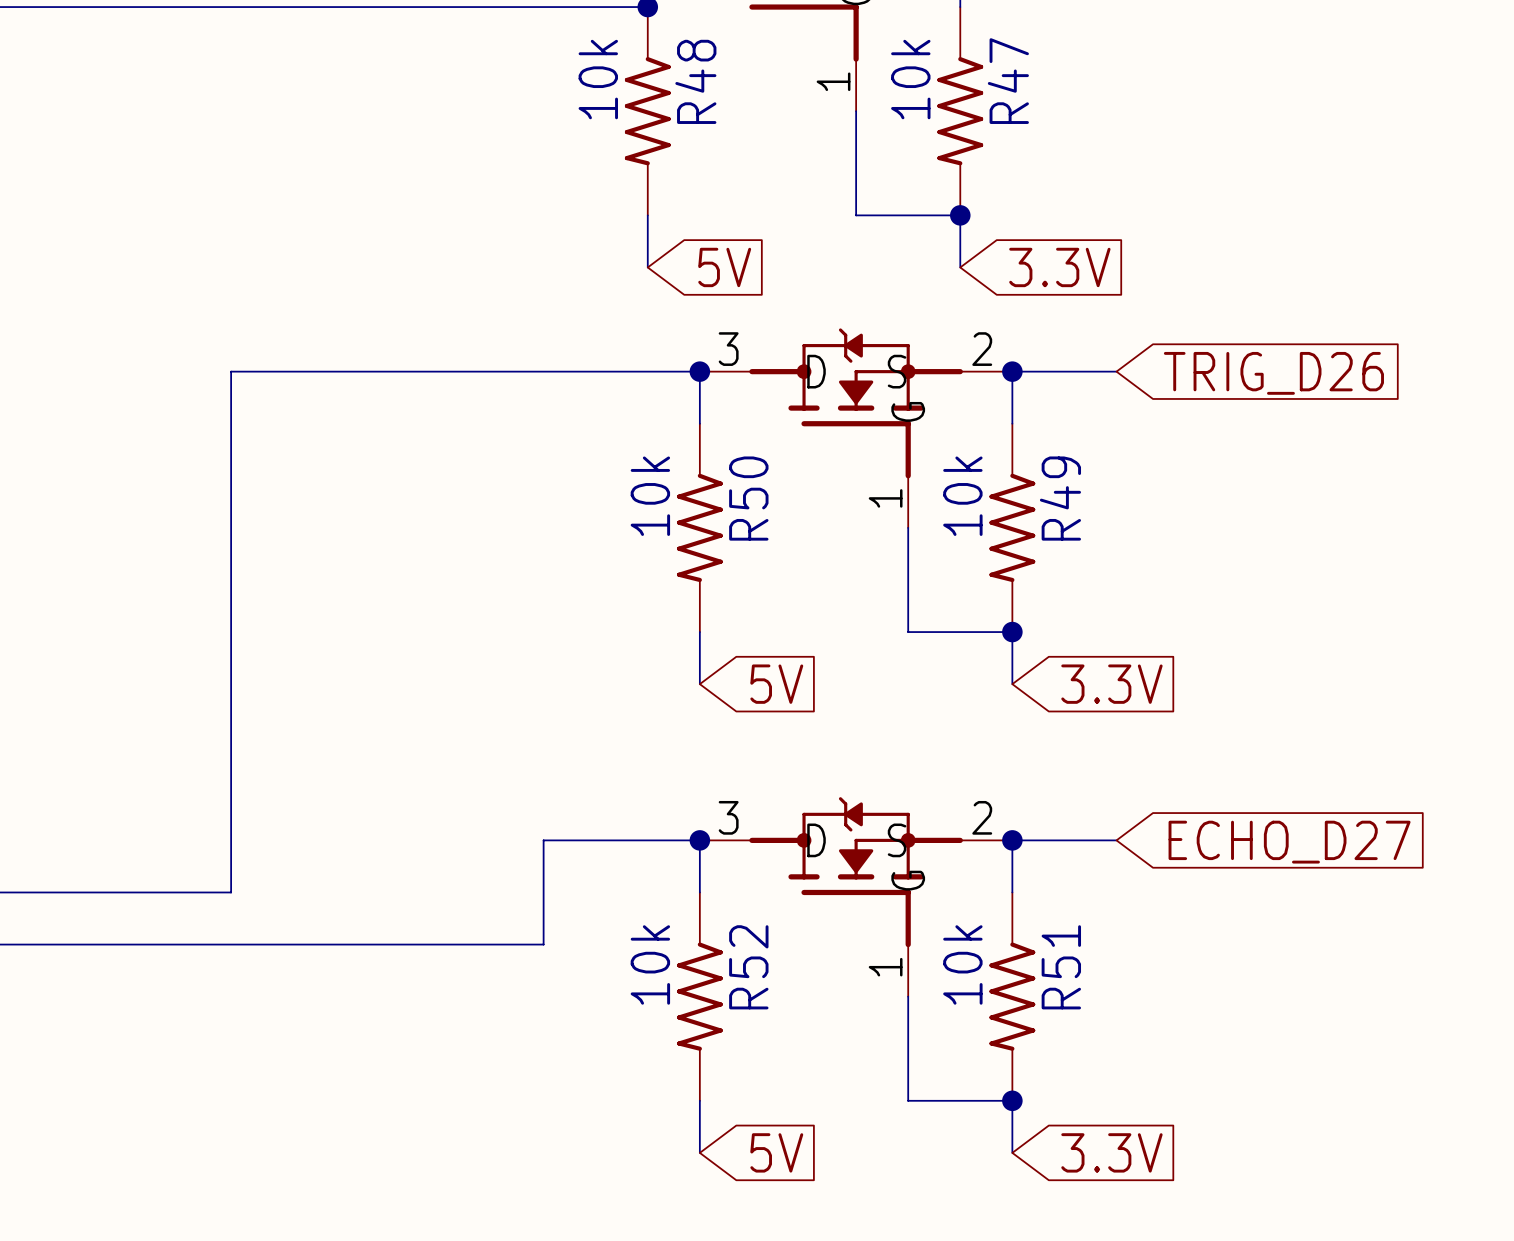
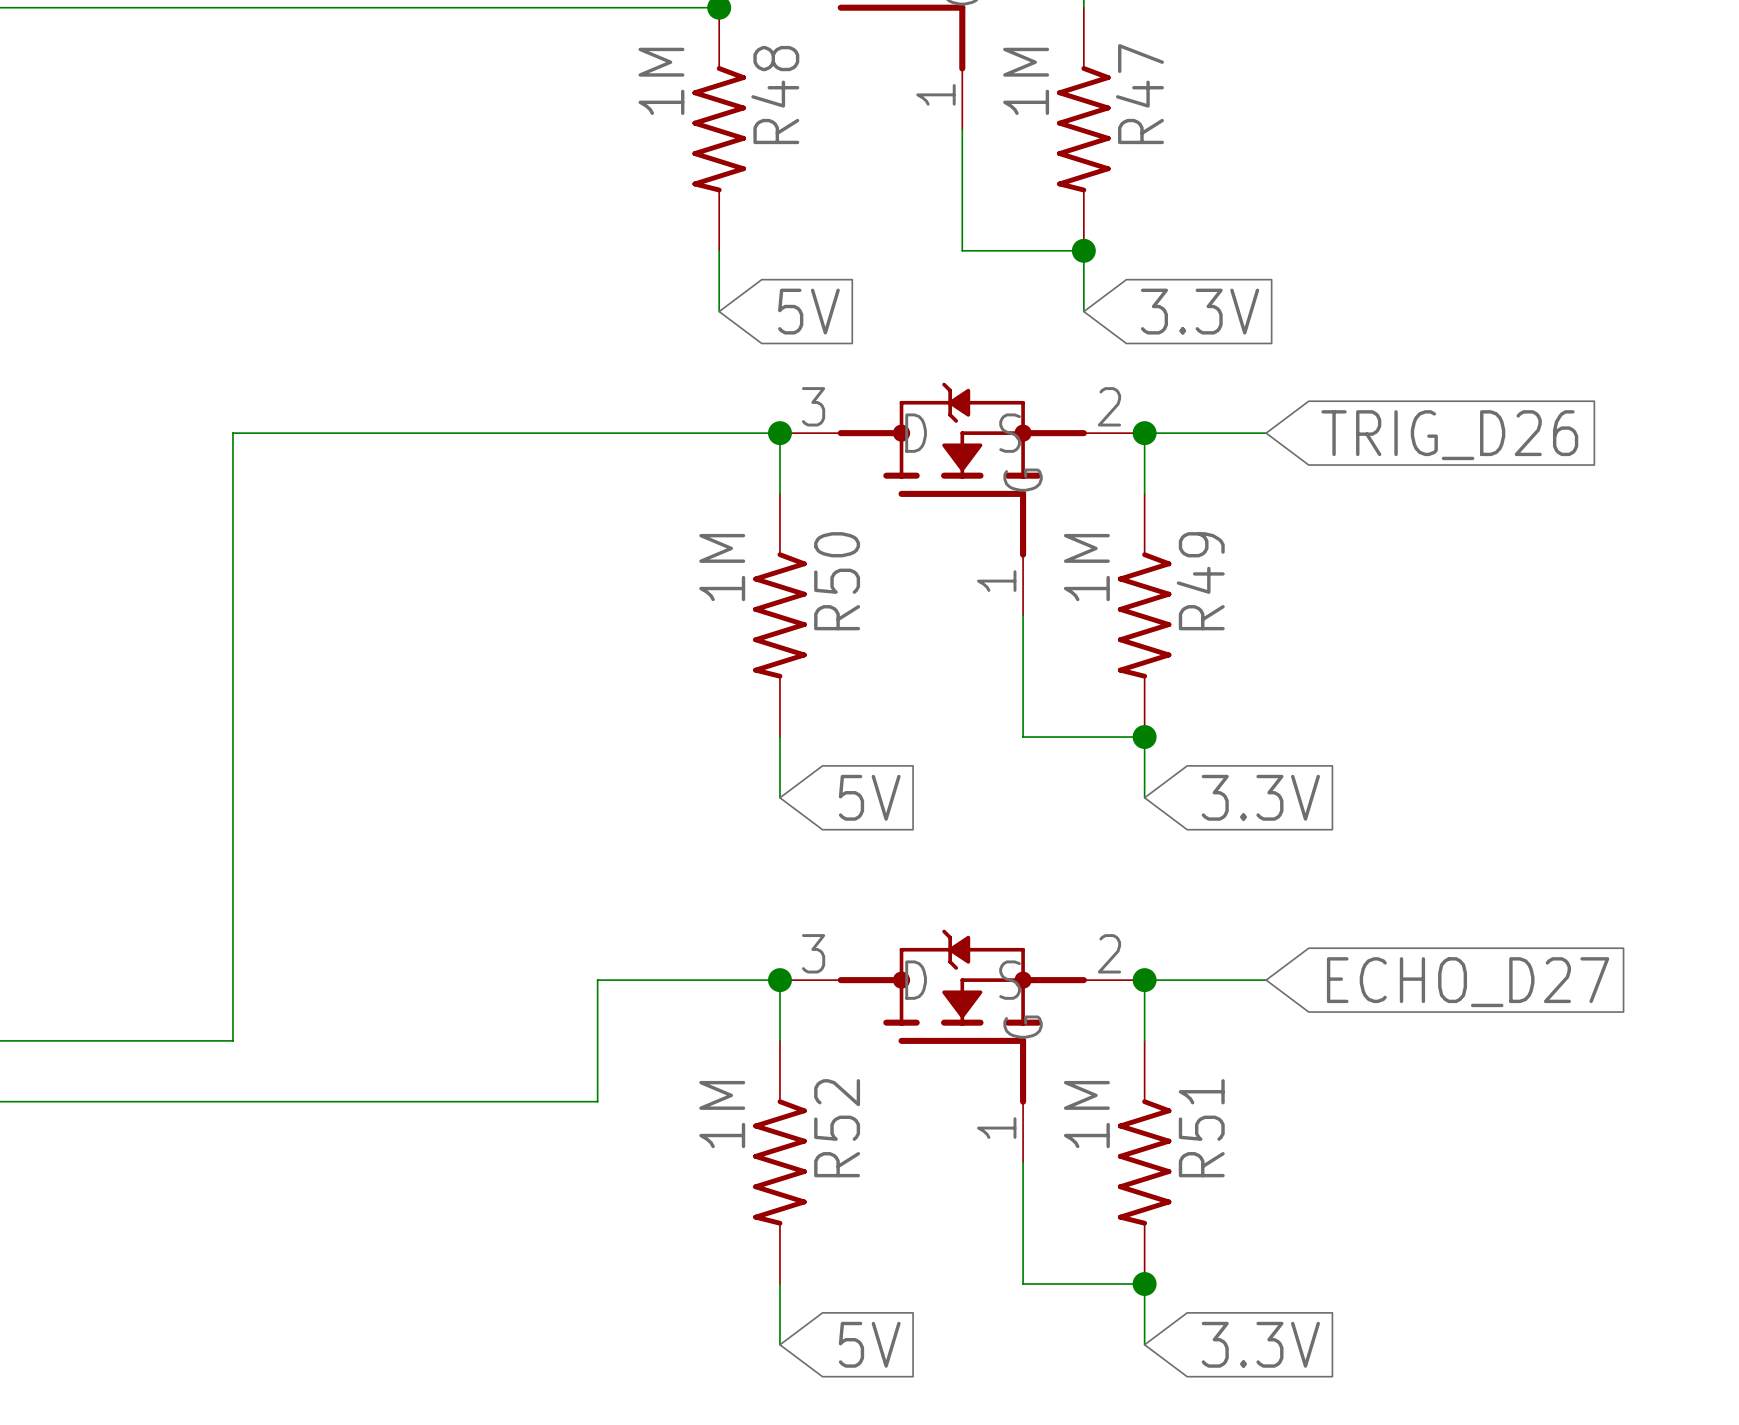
R48 value: 10k (598, 79) -> 1M (661, 81)
R47 value: 10k (910, 79) -> 1M (1026, 81)
R50 value: 10k (650, 496) -> 1M (722, 567)
R49 value: 10k (962, 496) -> 1M (1086, 567)
R52 value: 10k (650, 964) -> 1M (722, 1114)
R51 value: 10k (962, 964) -> 1M (1086, 1114)

